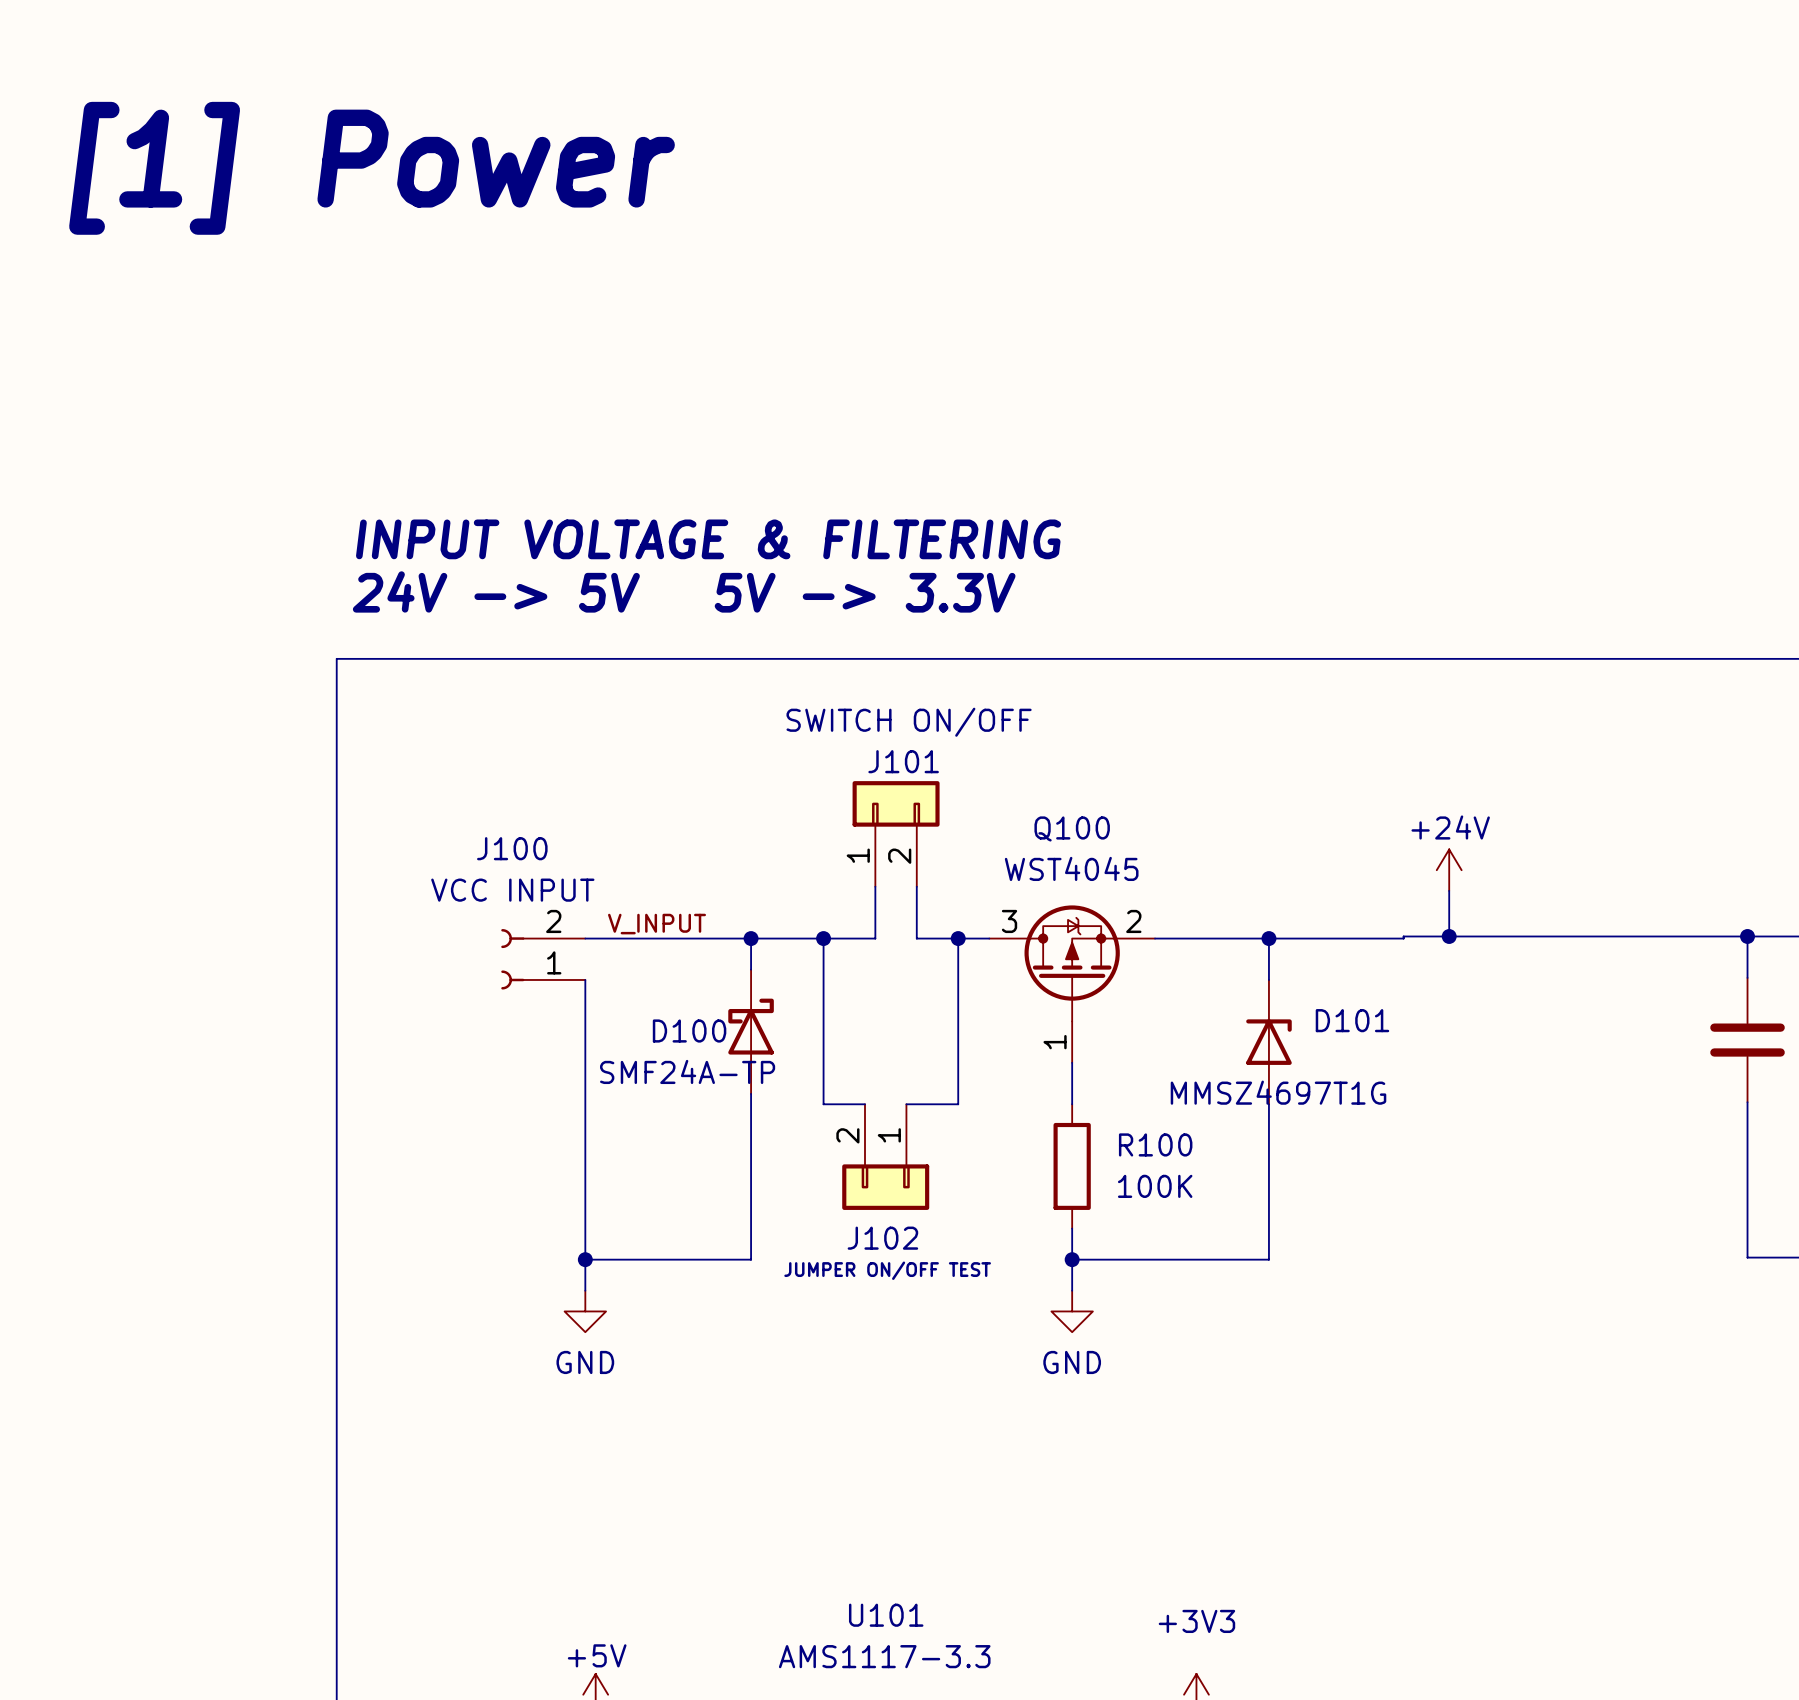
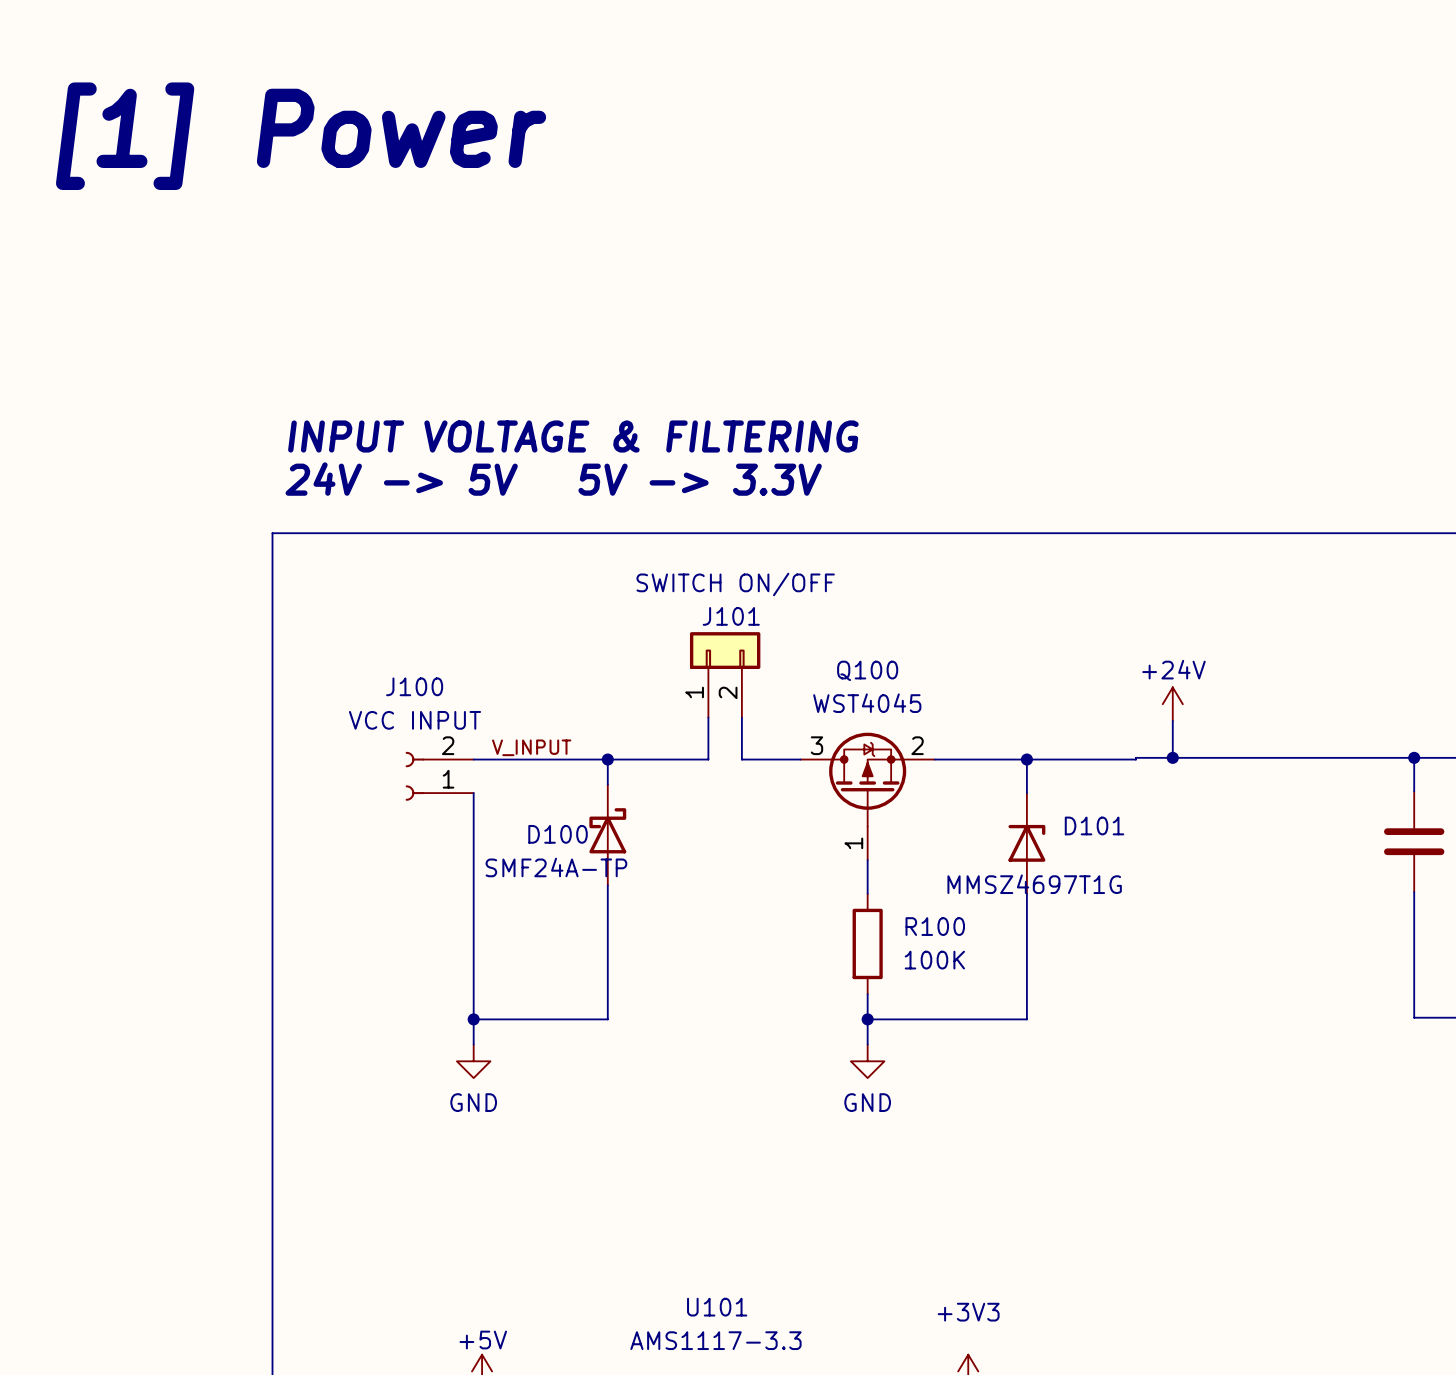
wire: (823, 938) (823, 1104) (865, 1104) -> none
junction: (823, 938) -> none
wire: (958, 938) (958, 1104) (906, 1104) -> none
junction: (958, 938) -> none
J102: JUMPER ON/OFF TEST (885, 1157) -> none

